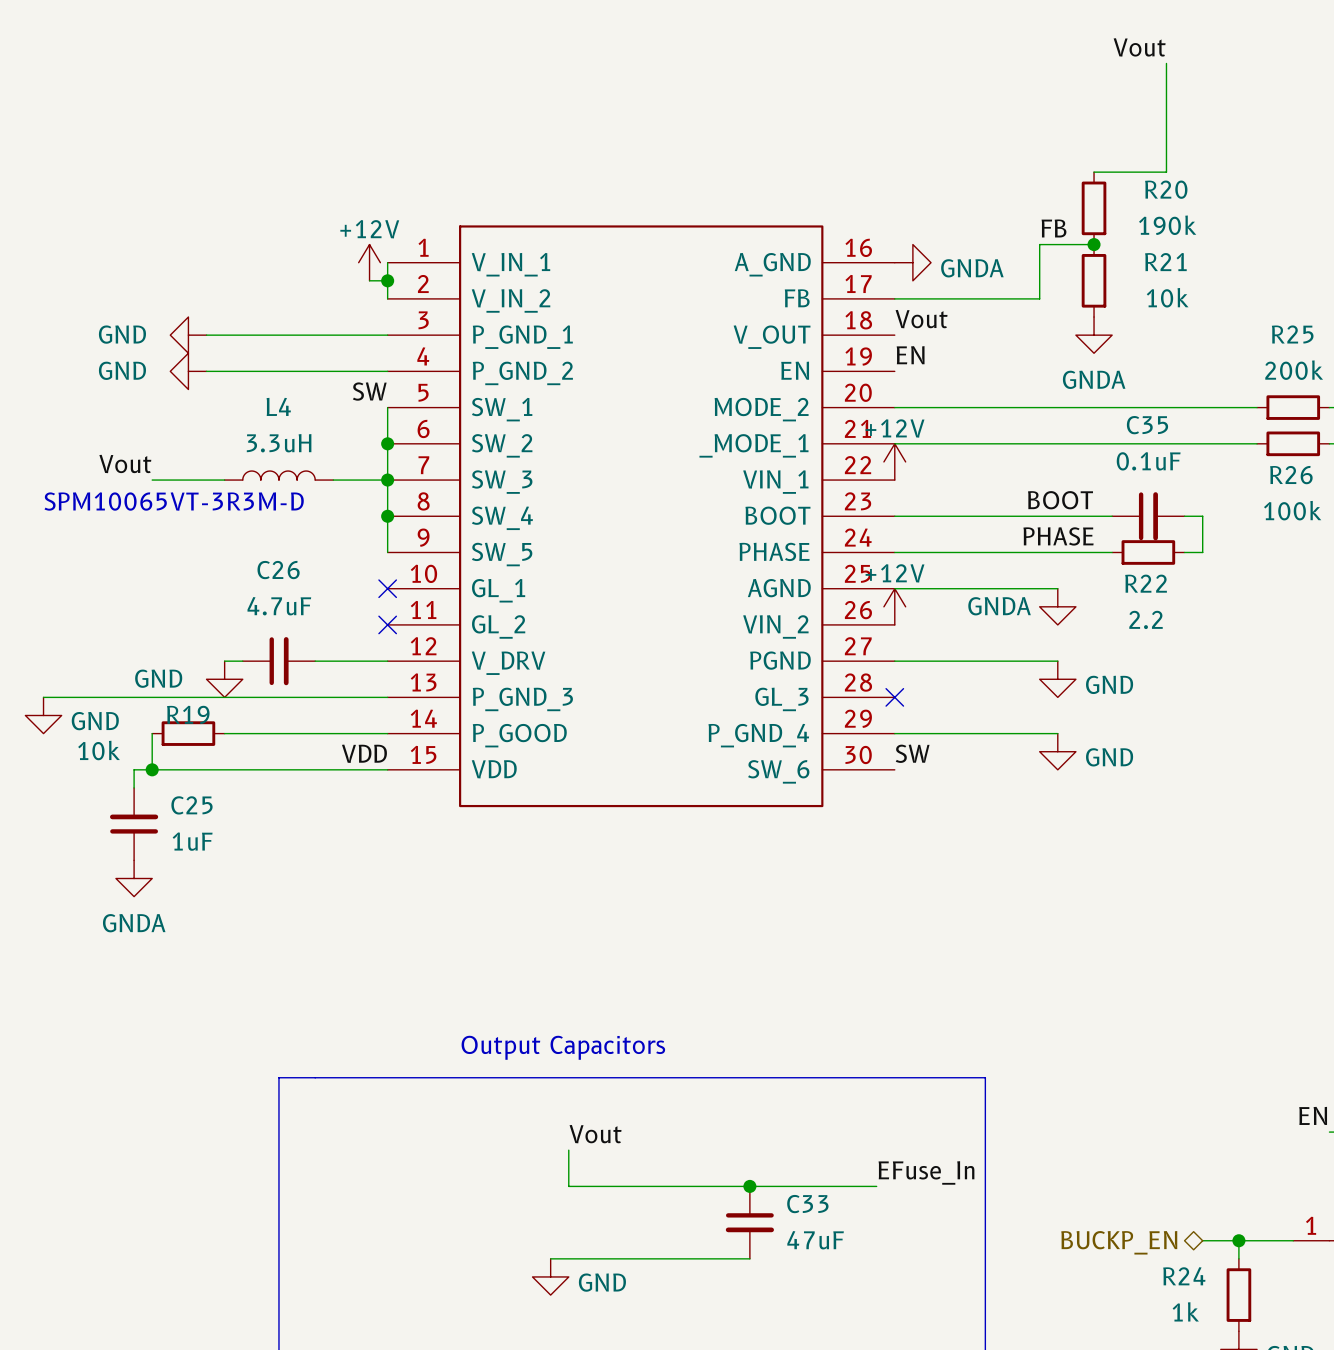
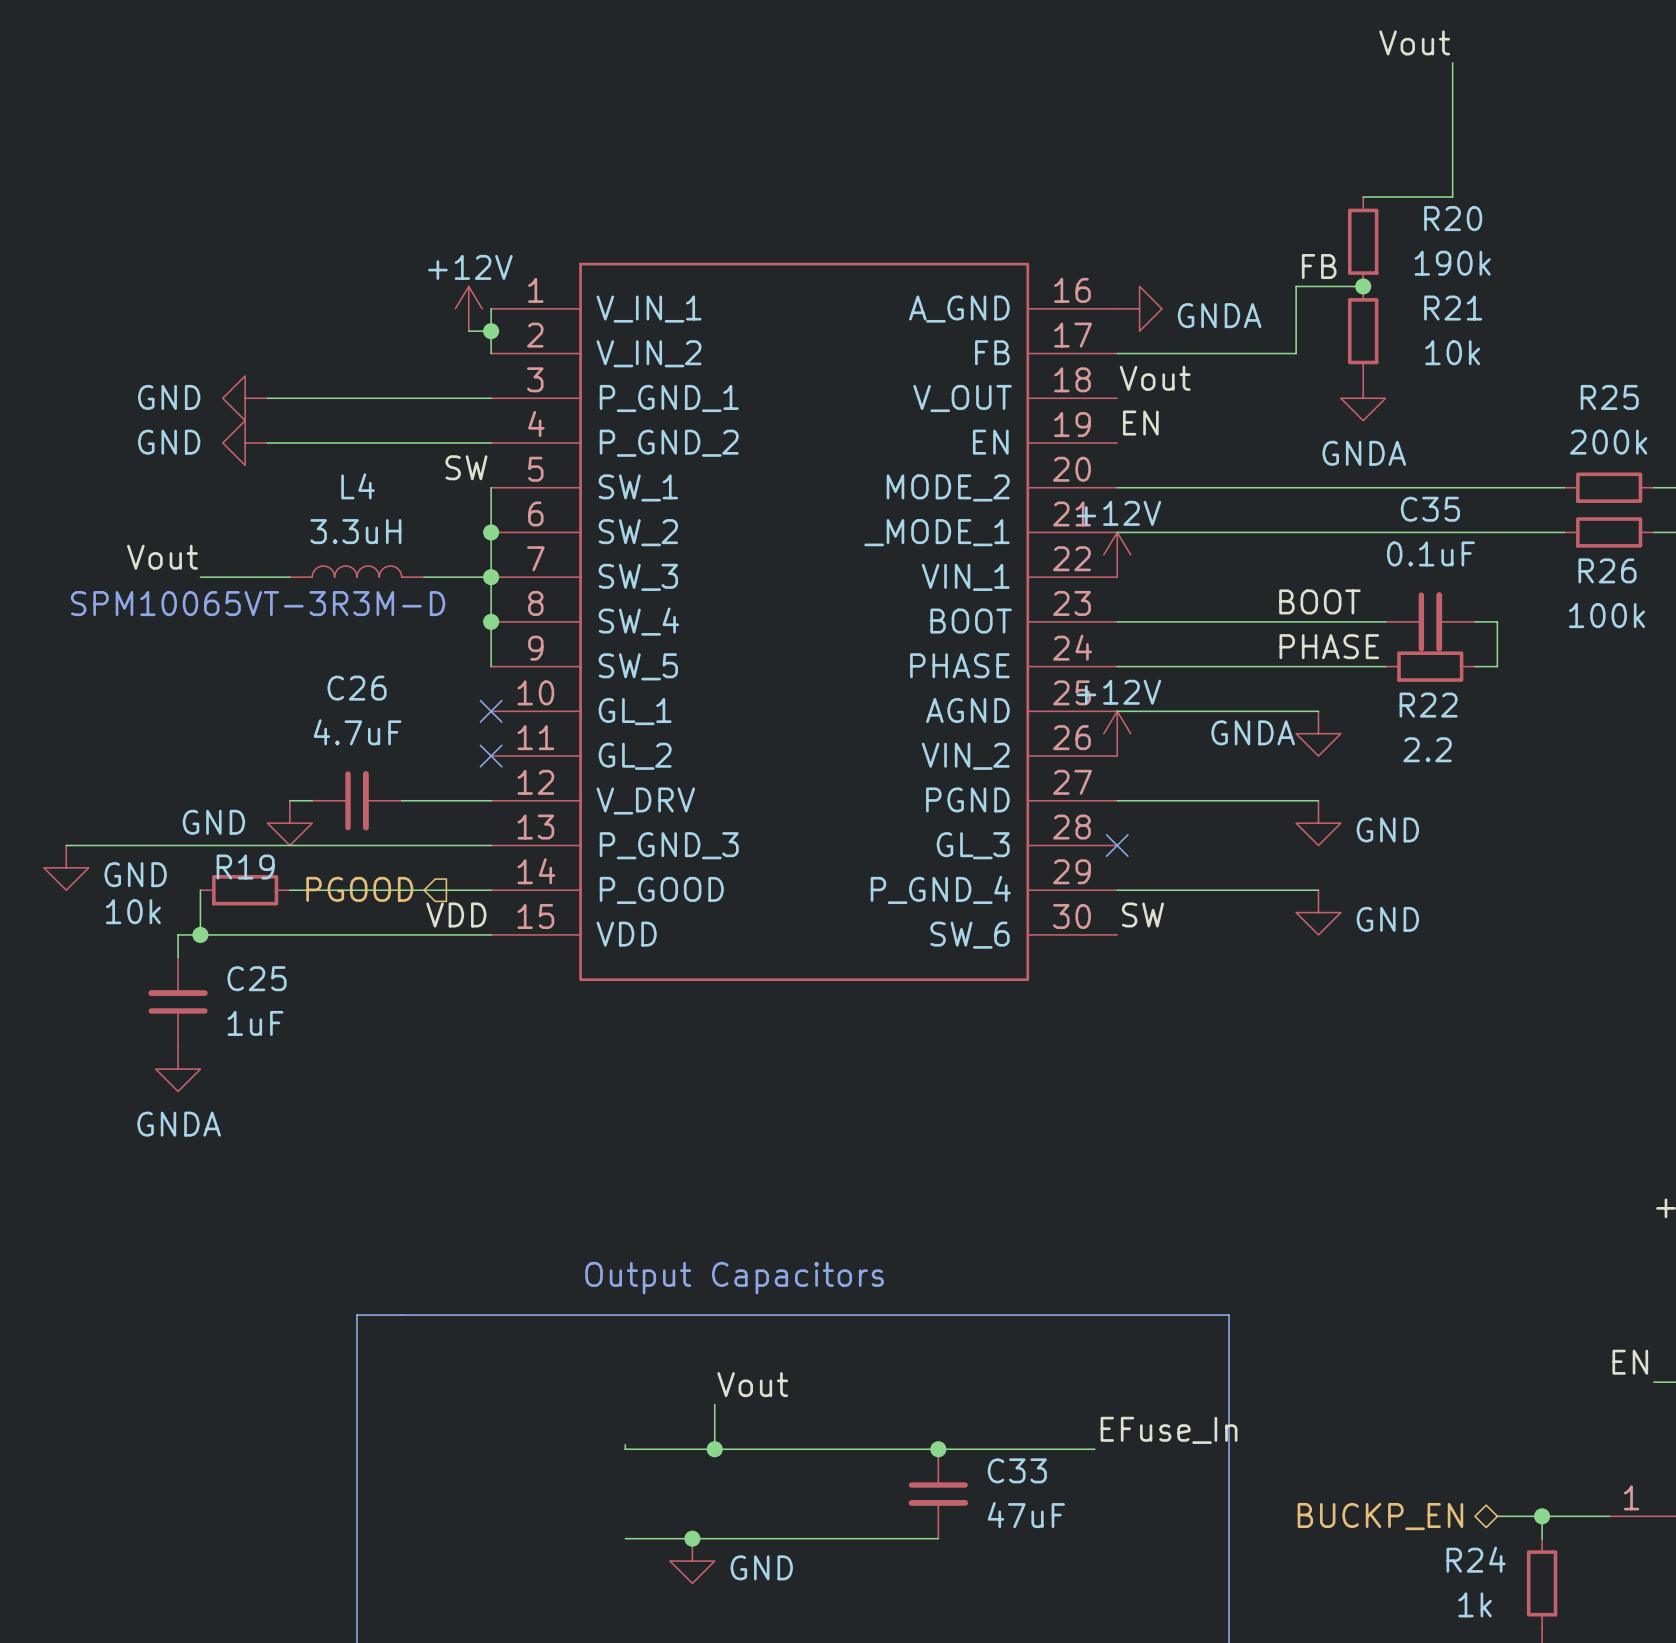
hierarchical label: none -> PGOOD (359, 889)
wire: none -> (625, 1444) (625, 1449) (714, 1449)
junction: none -> (714, 1449)
wire: none -> (625, 1538) (692, 1538)
junction: none -> (692, 1538)

